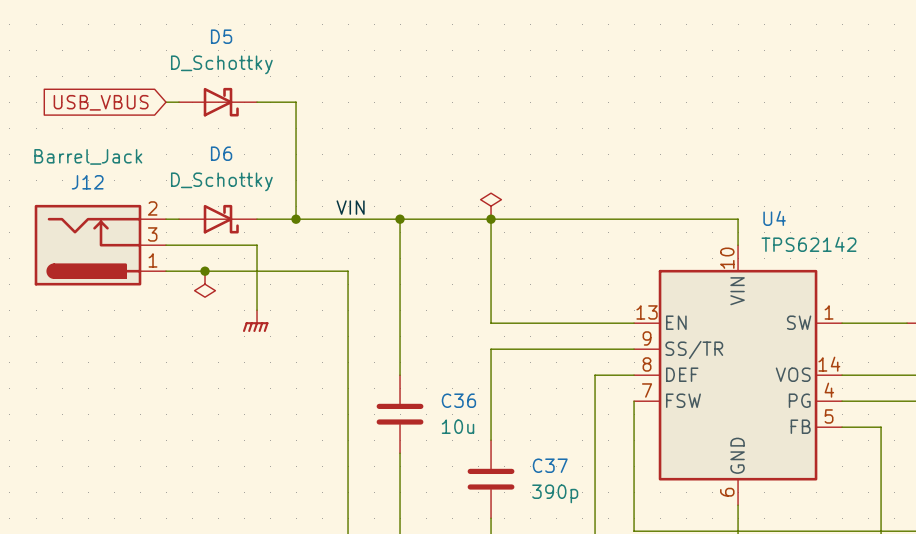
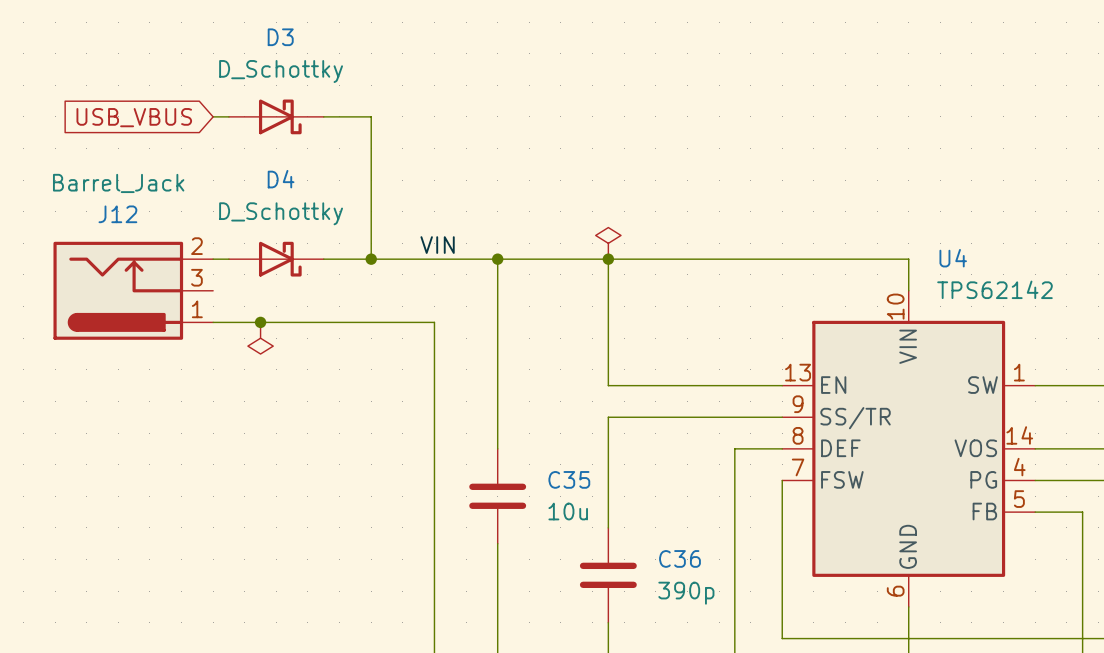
D5 name: D5 (221, 36) -> D3 (280, 37)
D6 name: D6 (221, 153) -> D4 (281, 179)
wire: (166, 245) (257, 245) (257, 310) -> none
power symbol: (255, 321) -> none
C36 name: C36 (458, 400) -> C35 (569, 479)
C37 name: C37 (550, 465) -> C36 (679, 558)

